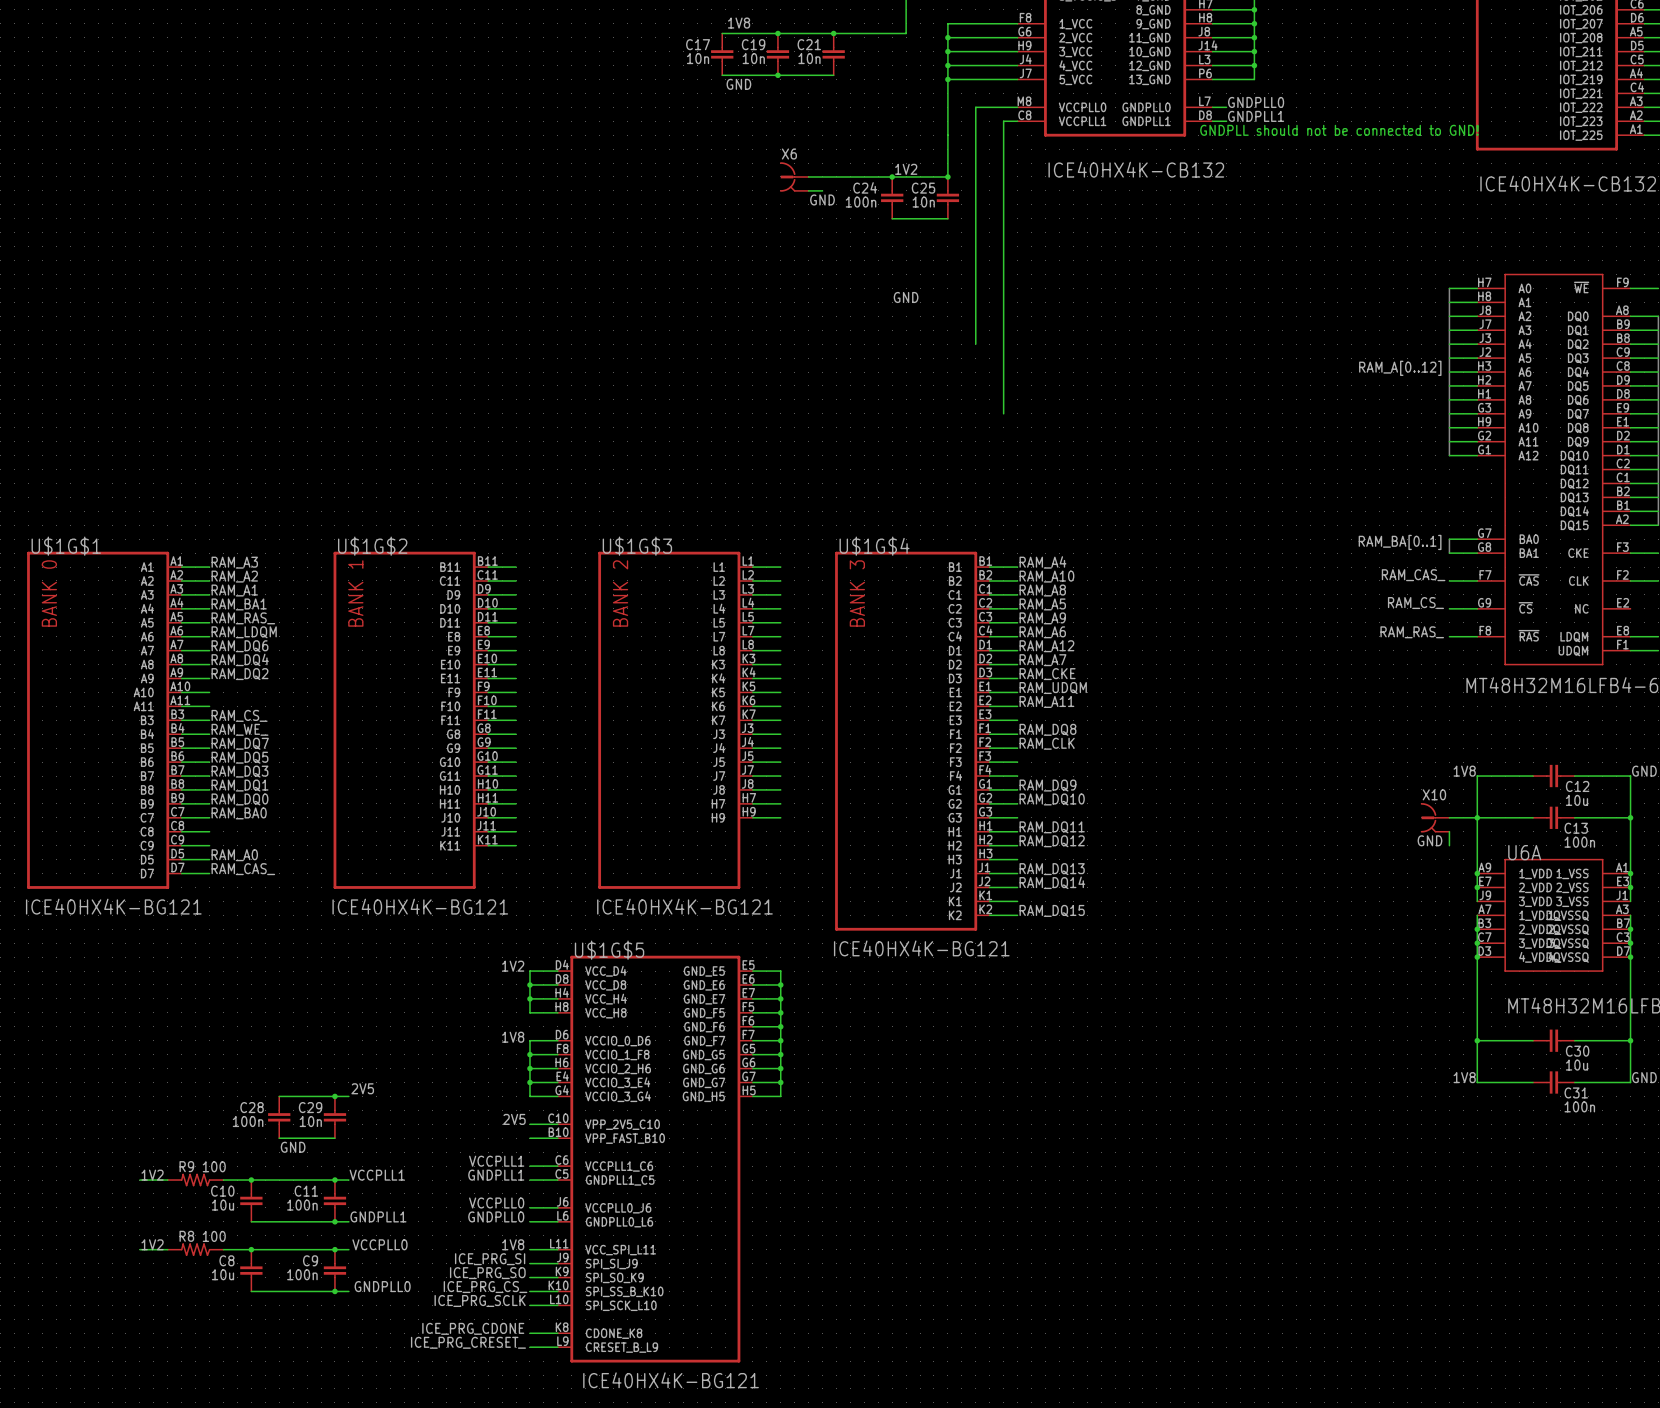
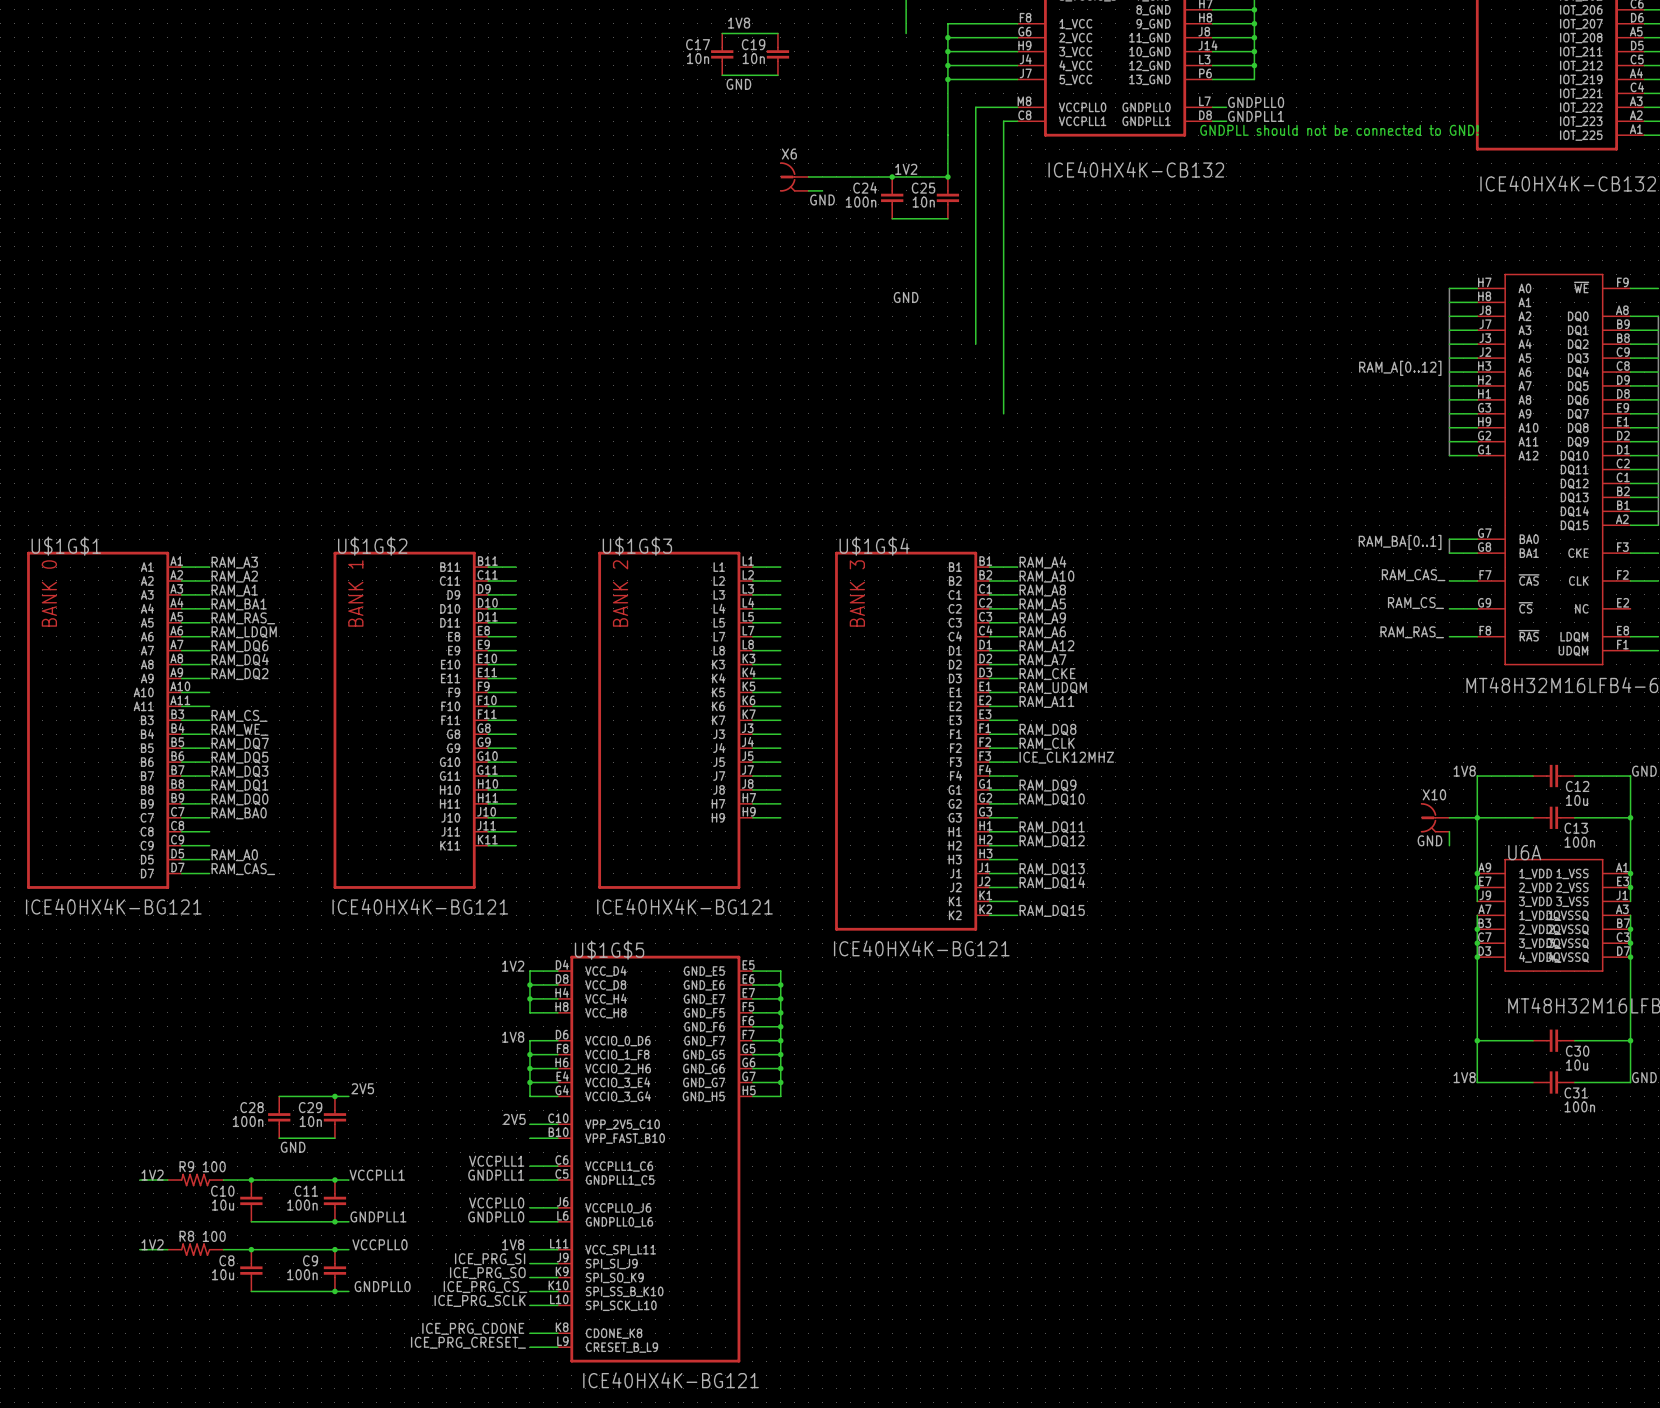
wire: (777, 33) (906, 33) -> none
junction: (777, 33) -> none
junction: (833, 33) -> none
C21: 10n (833, 54) -> none
wire: (777, 75) (833, 75) -> none
junction: (777, 75) -> none
label: none -> ICE_CLK12MHZ (1066, 757)

